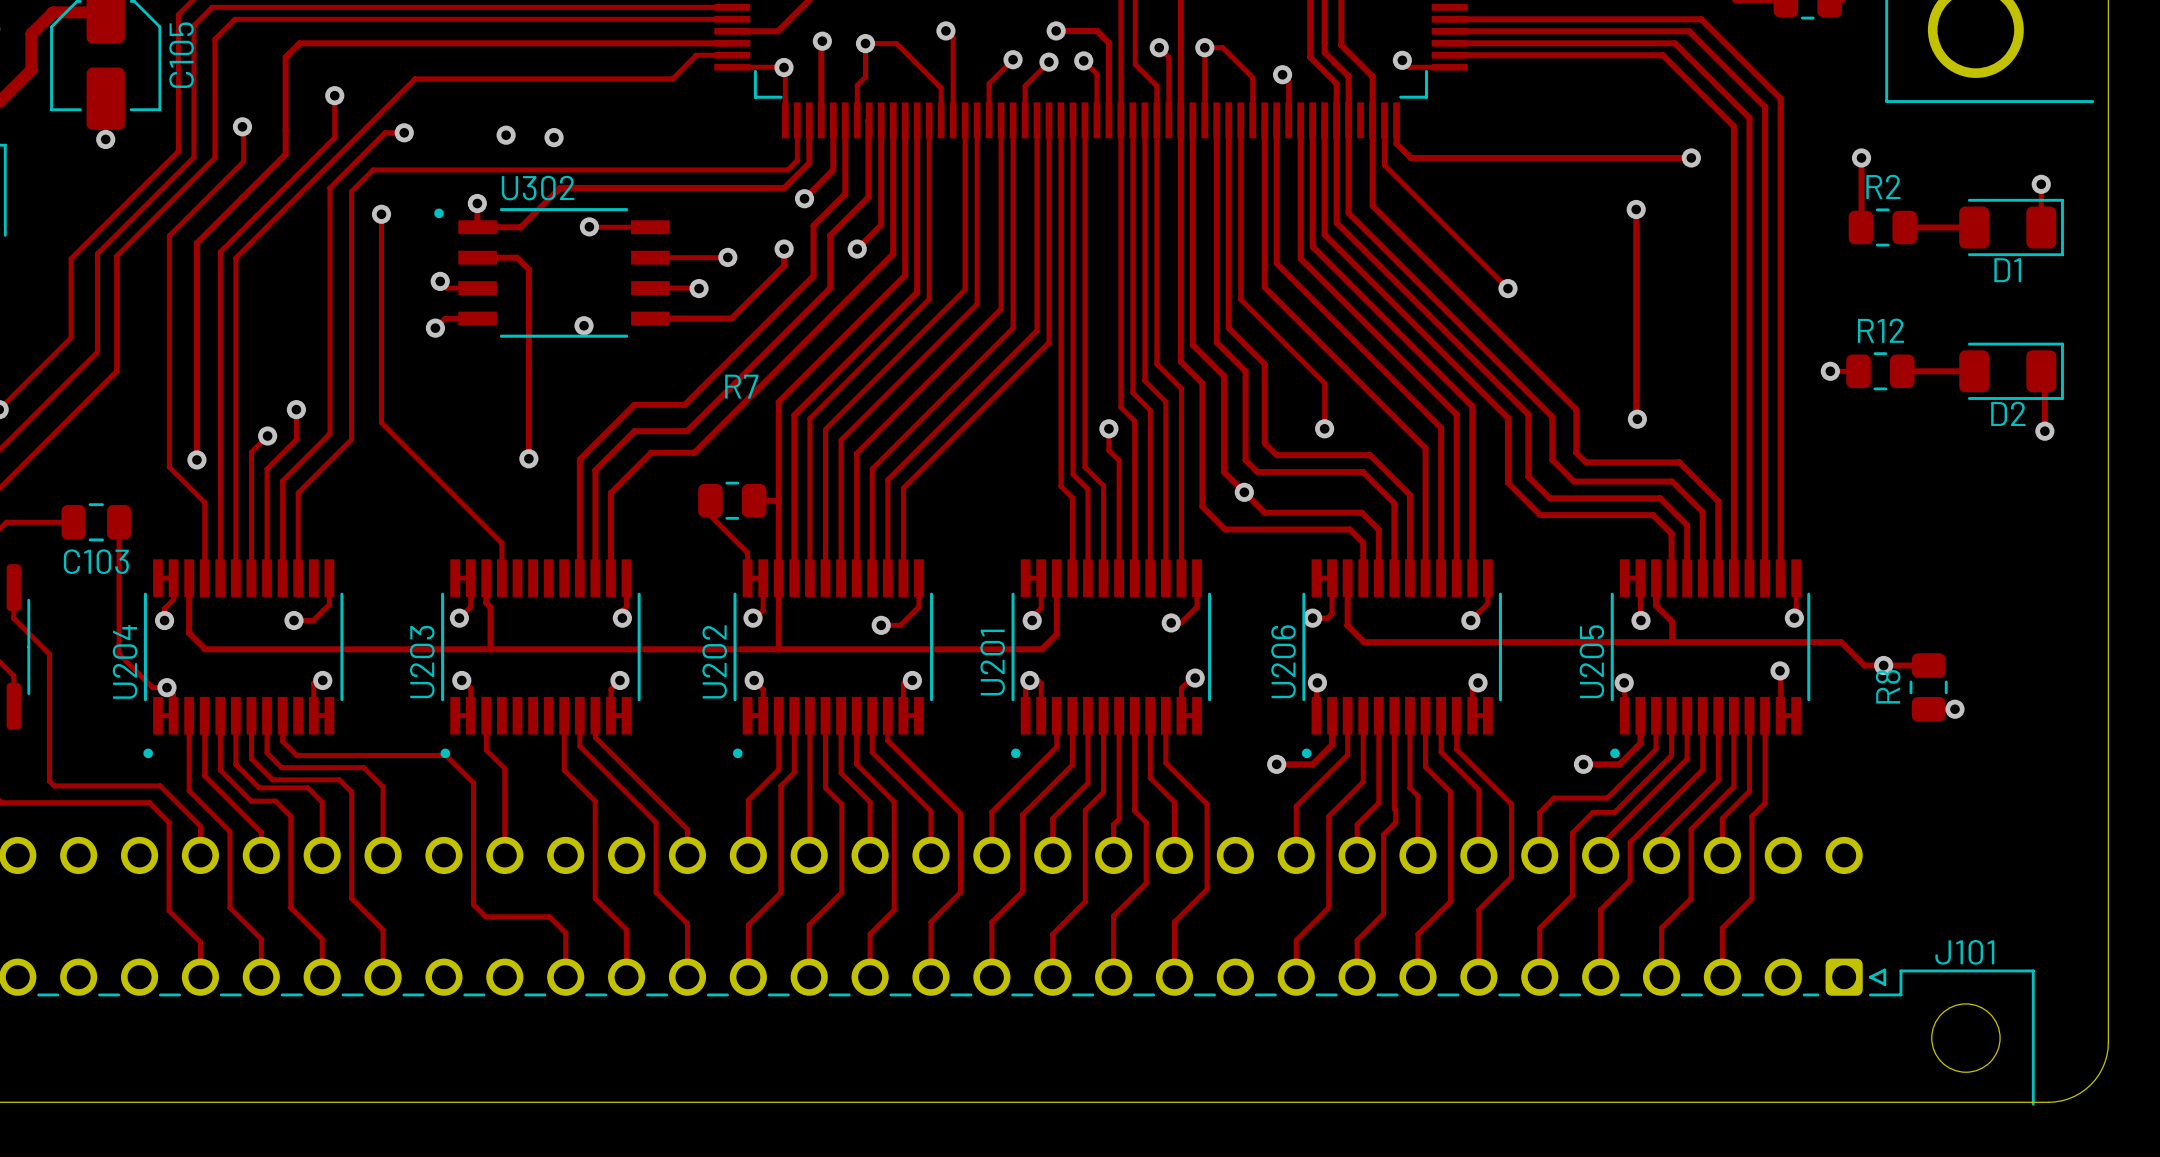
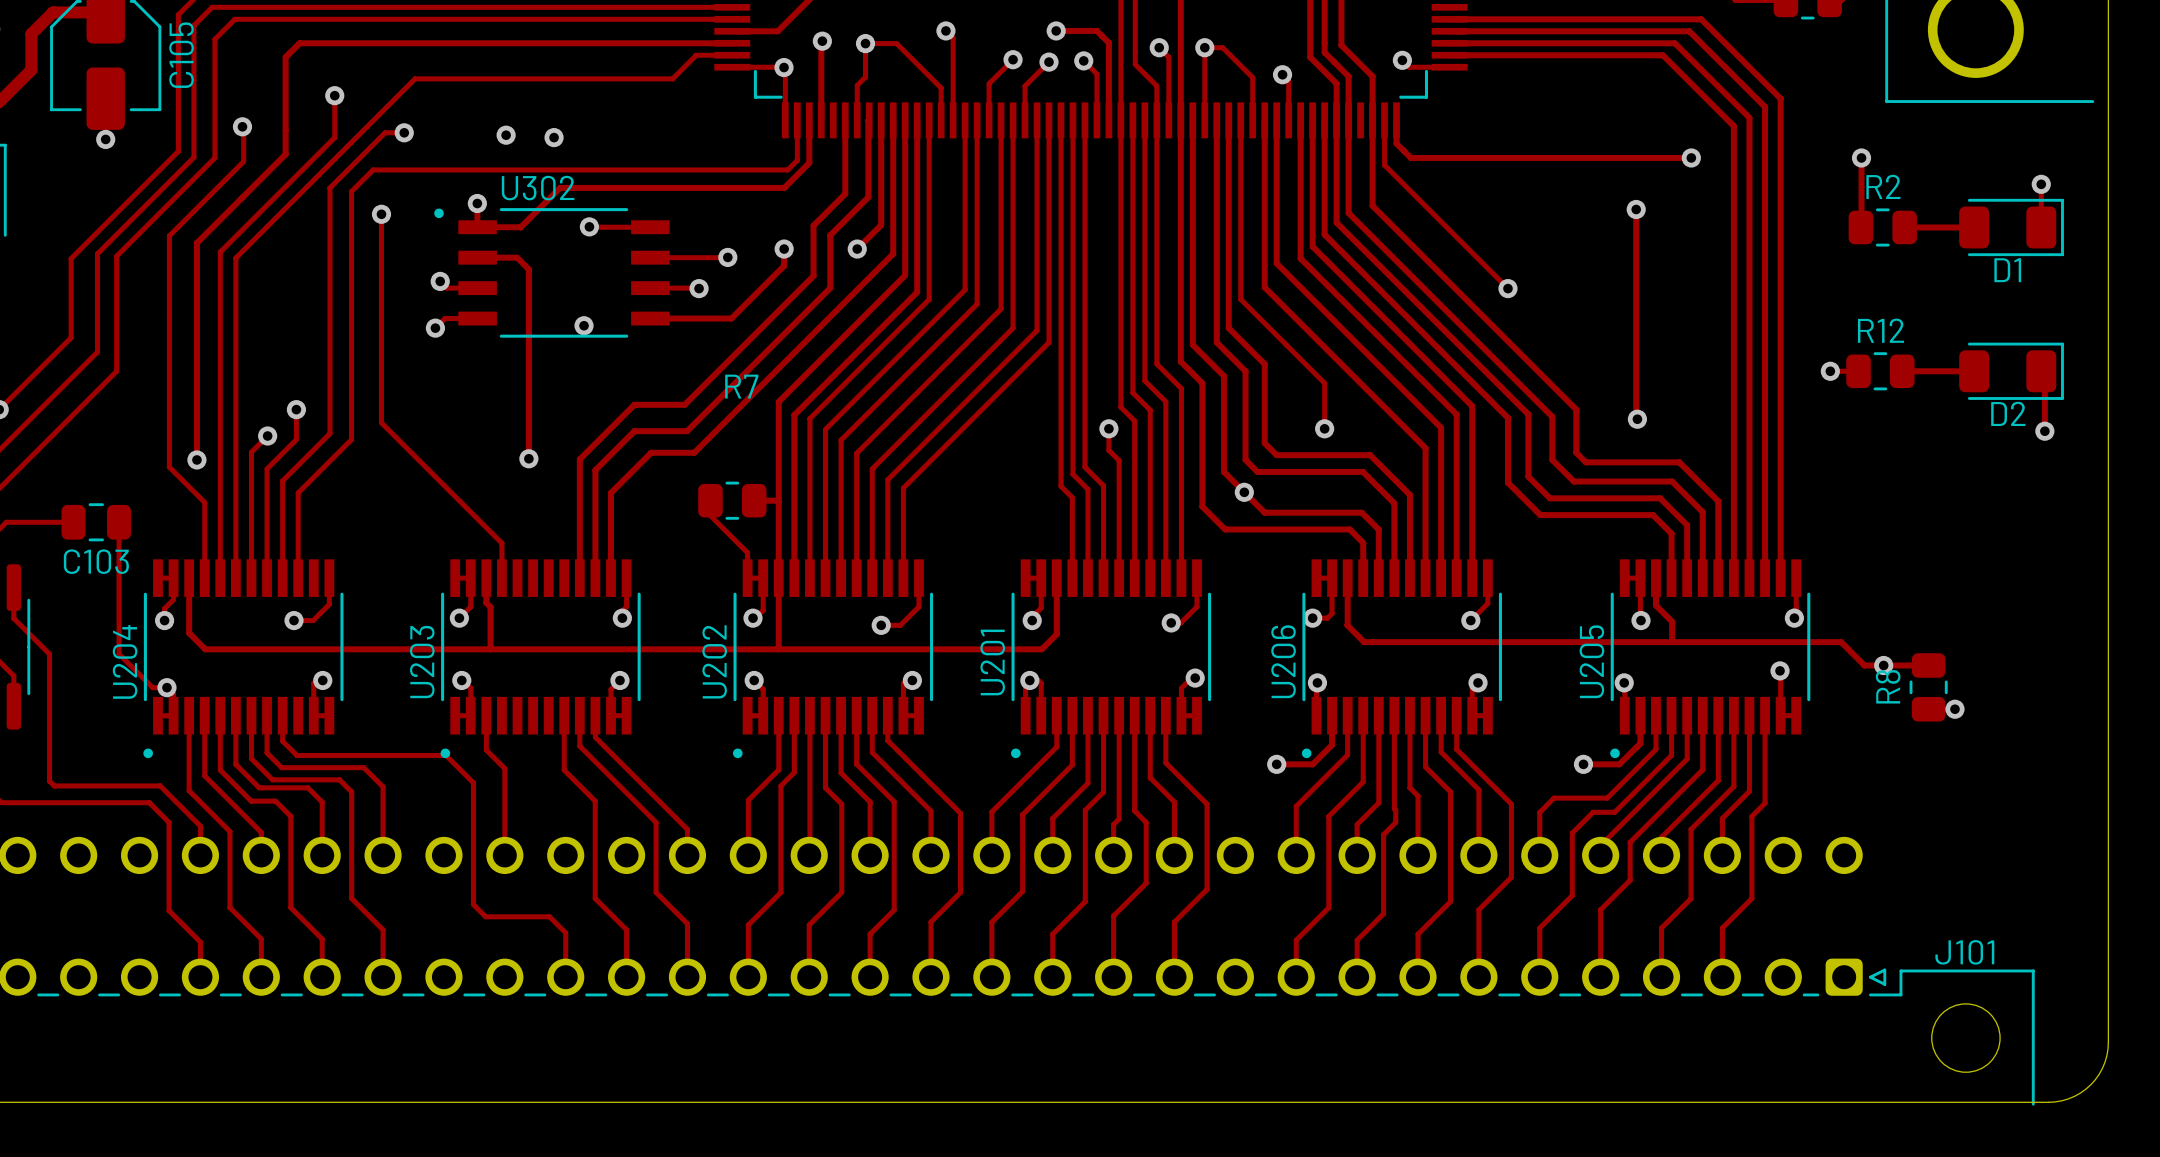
track: (833, 120) (833, 169) (804, 198) -> none
via: (804, 198) -> none

